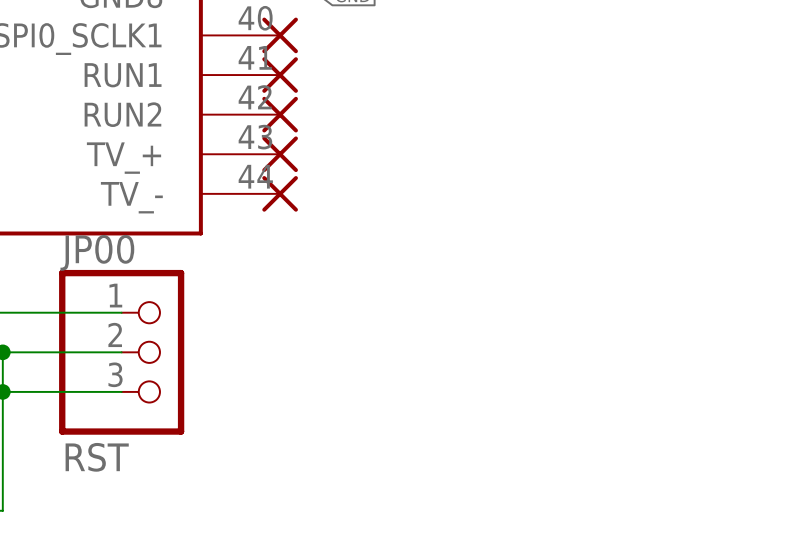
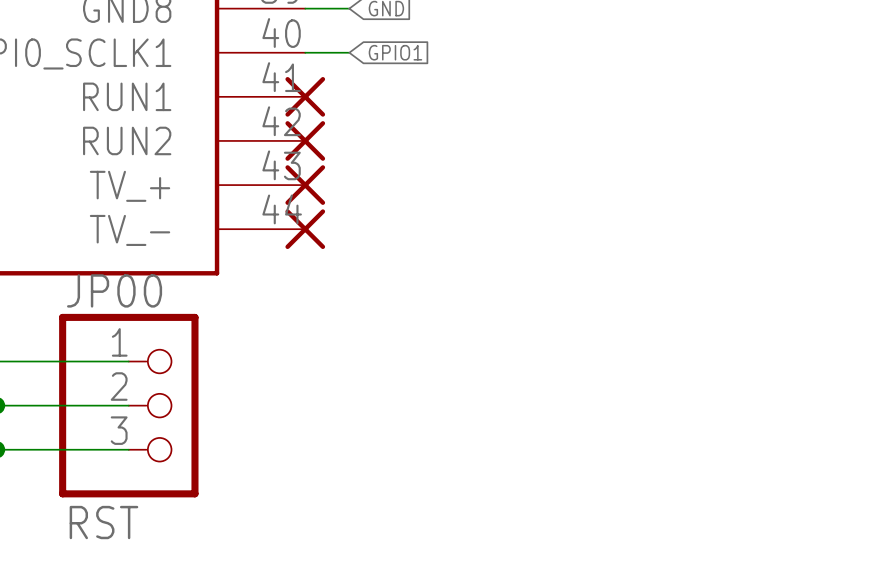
wire: none -> (305, 52) (349, 52)
part: (280, 35) -> none
global label: none -> GPIO1 (395, 52)

